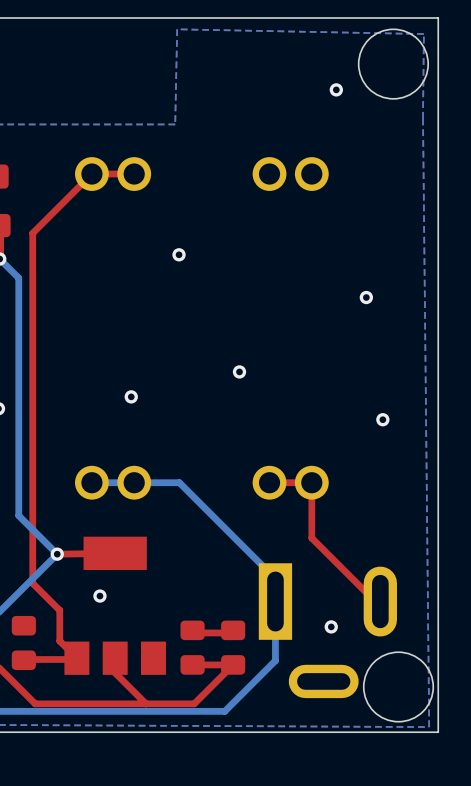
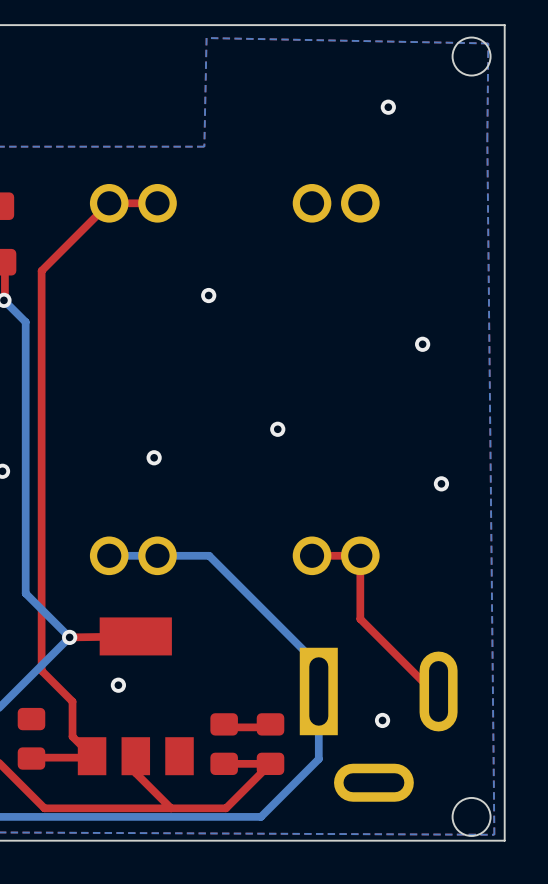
round board edge: [357, 28, 430, 100] -> none
round board edge: none -> [451, 36, 492, 77]
round board edge: [362, 651, 435, 723] -> none
round board edge: none -> [451, 797, 492, 837]

